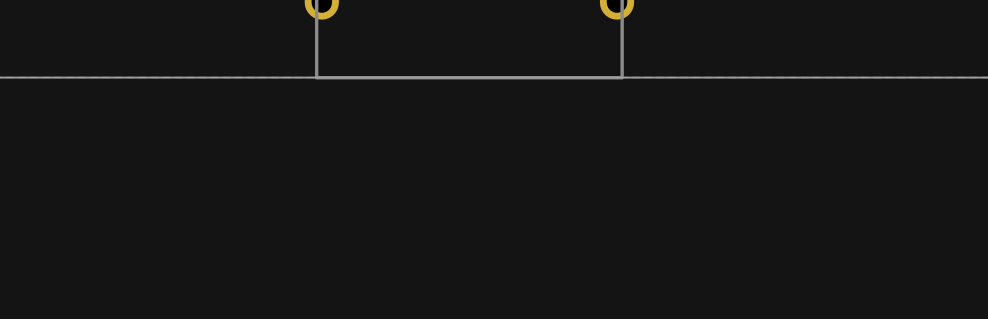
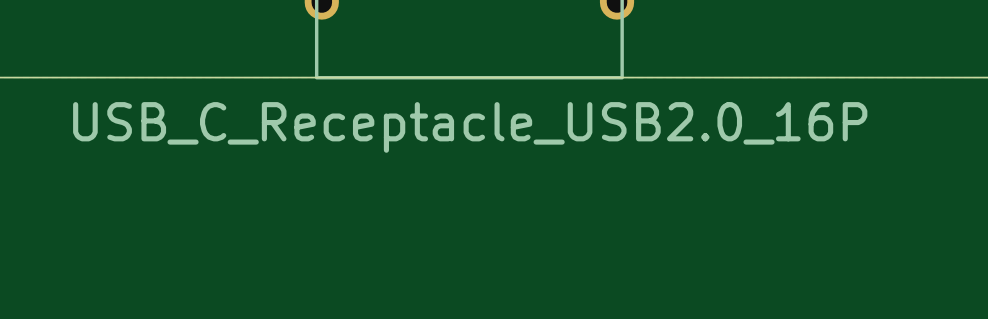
part value: none -> USB_C_Receptacle_USB2.0_16P (470, 127)

